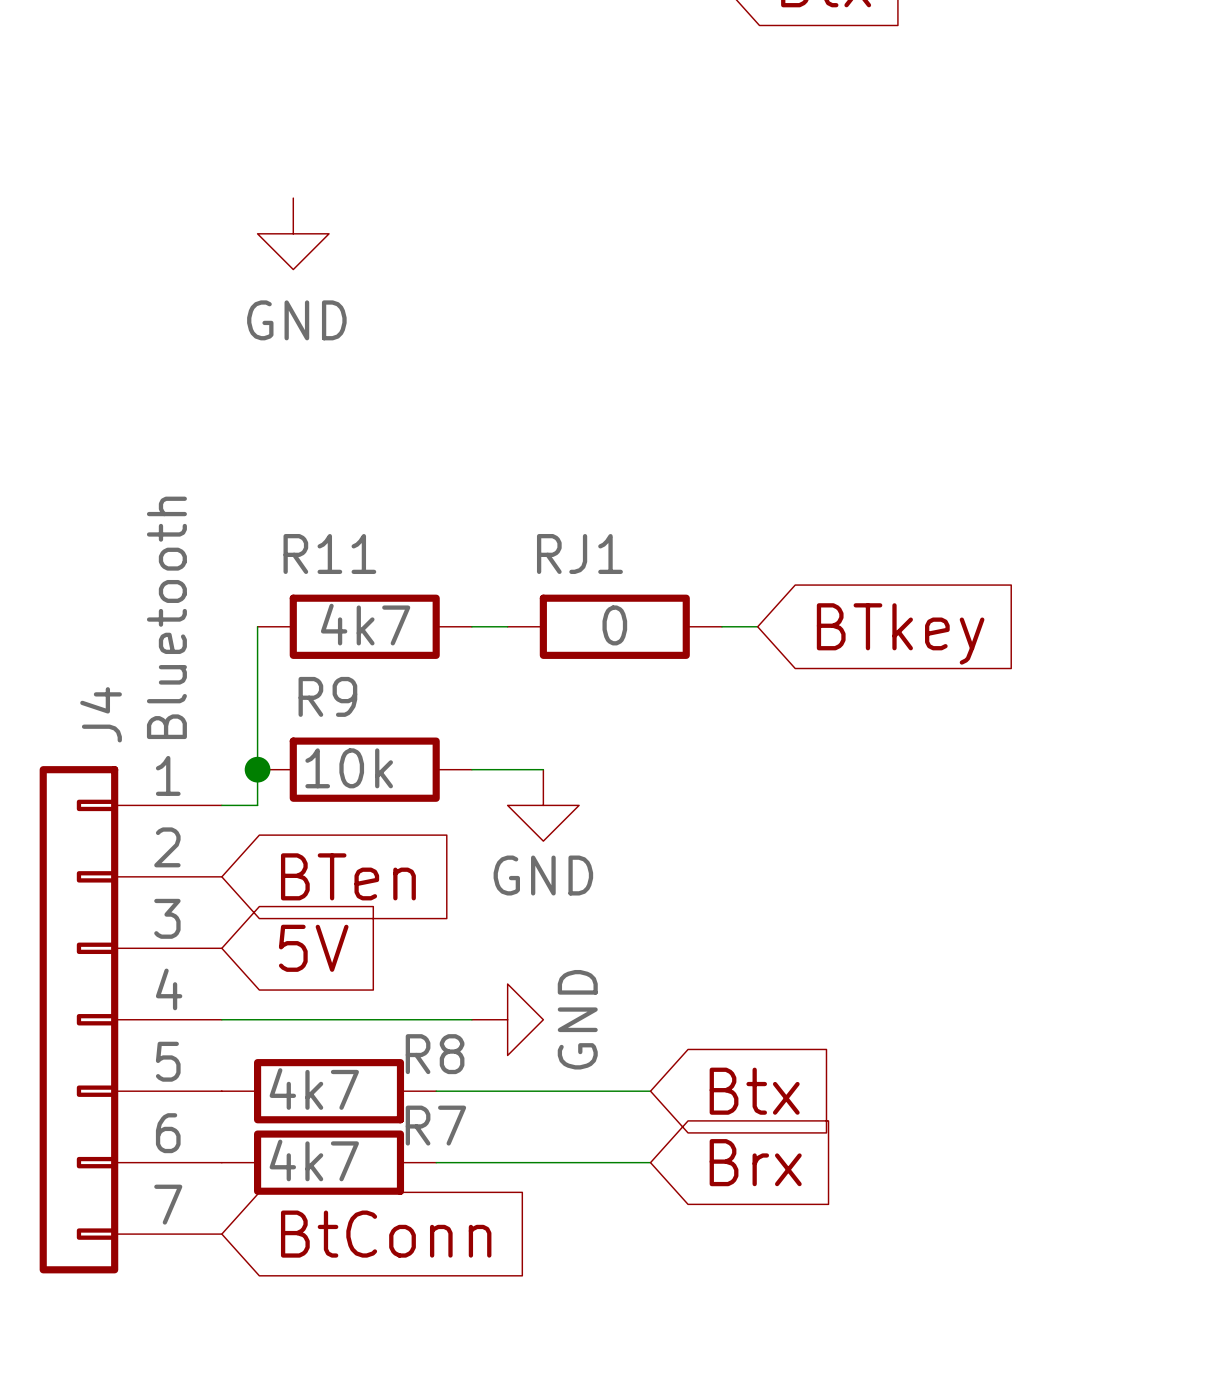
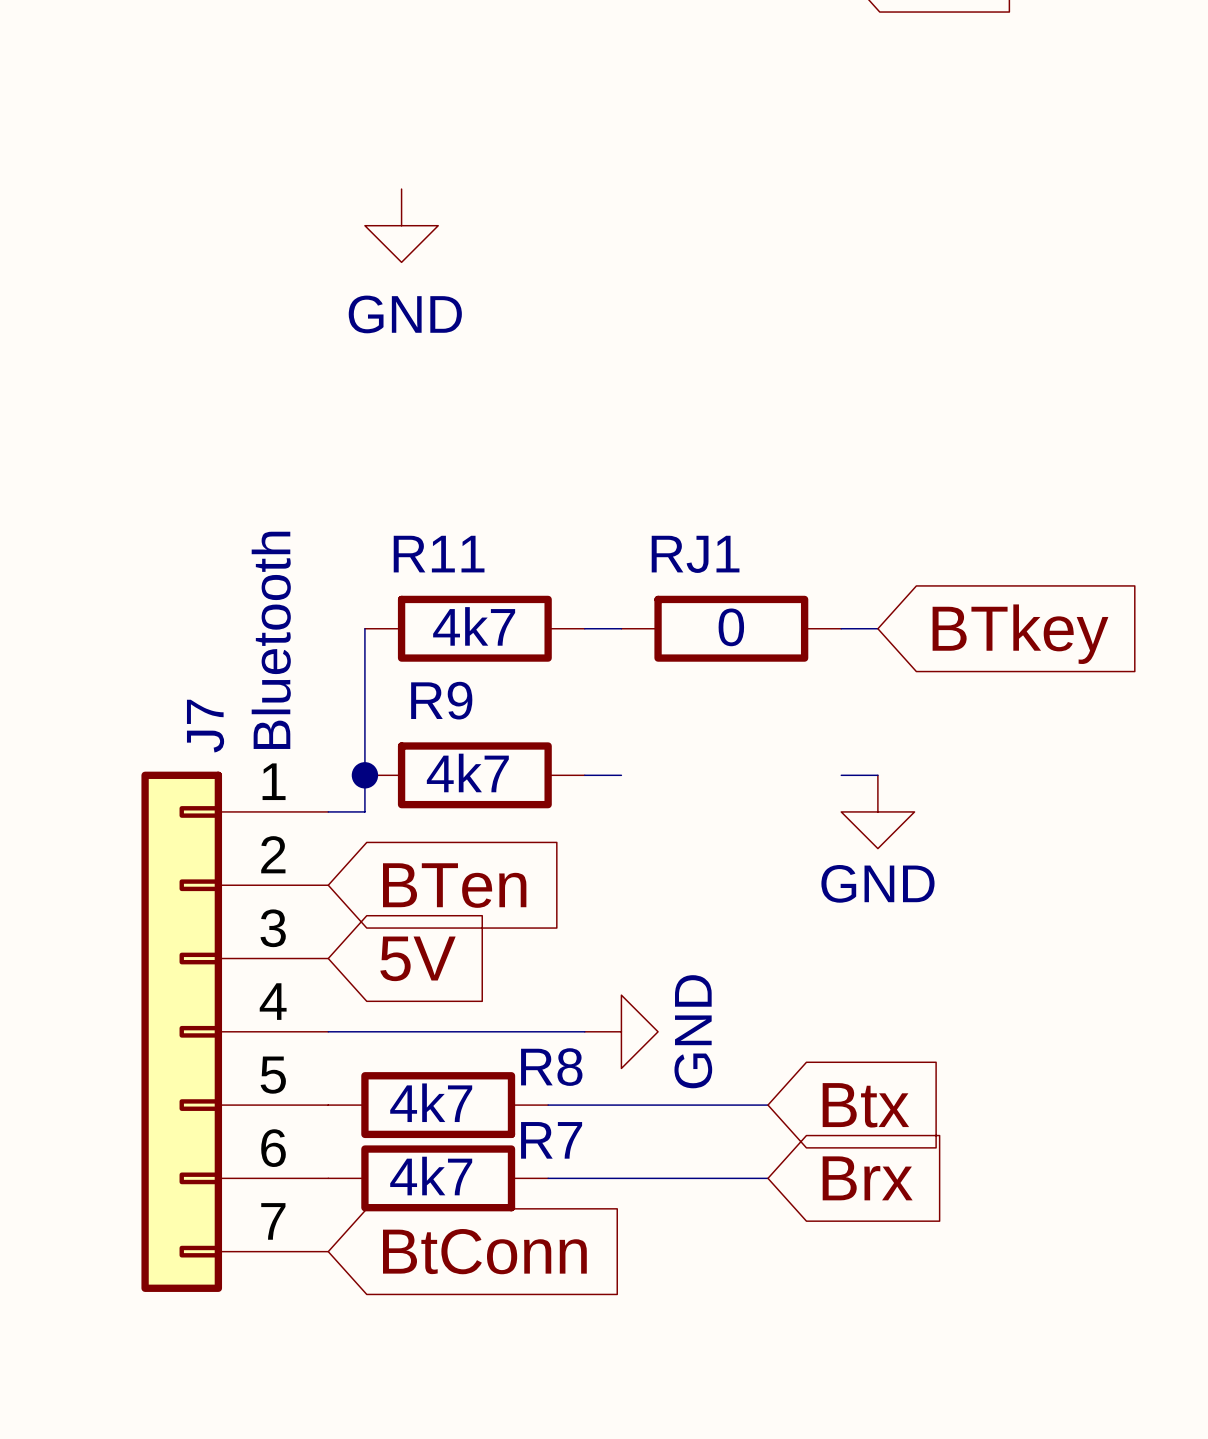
J4 name: J4 (101, 714) -> J7 (205, 726)
R9 value: 10k (349, 768) -> 4k7 (467, 772)
wire: (507, 769) (543, 769) -> (841, 775) (877, 775)
power symbol position: GND (543, 805) -> GND (877, 811)

